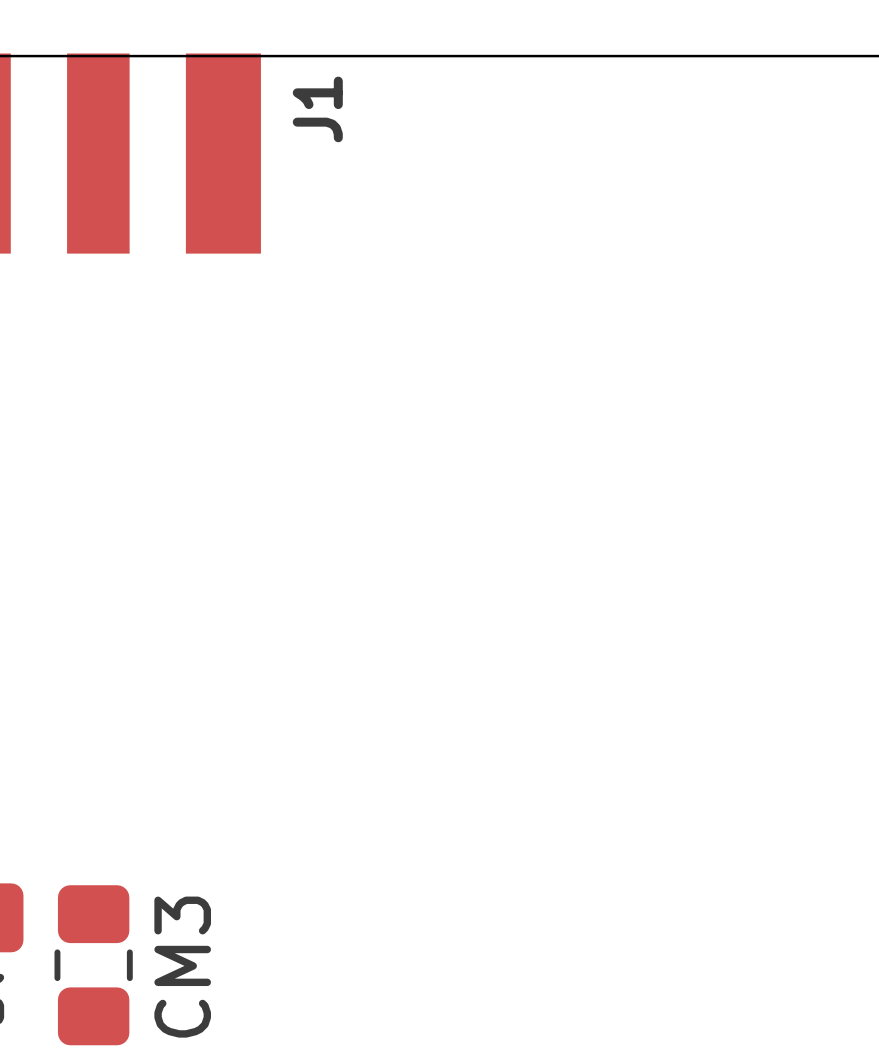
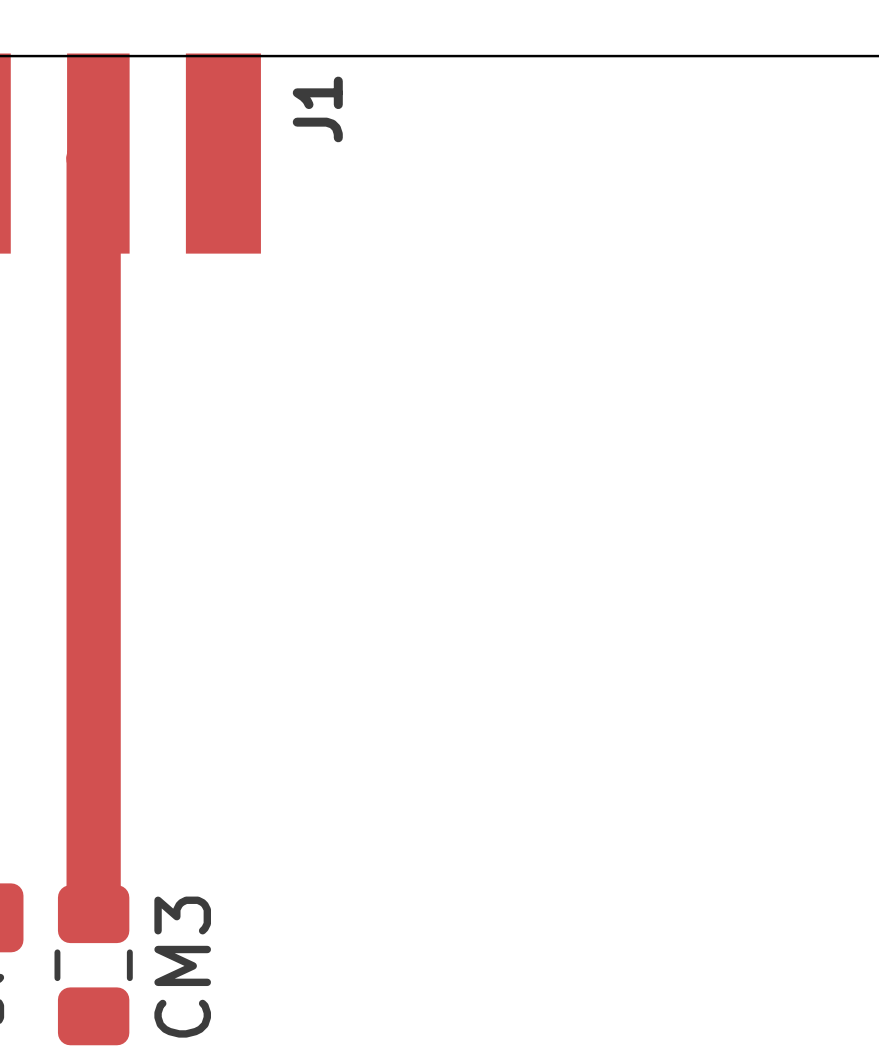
track: none -> (98, 153) (93, 158) (93, 914)

